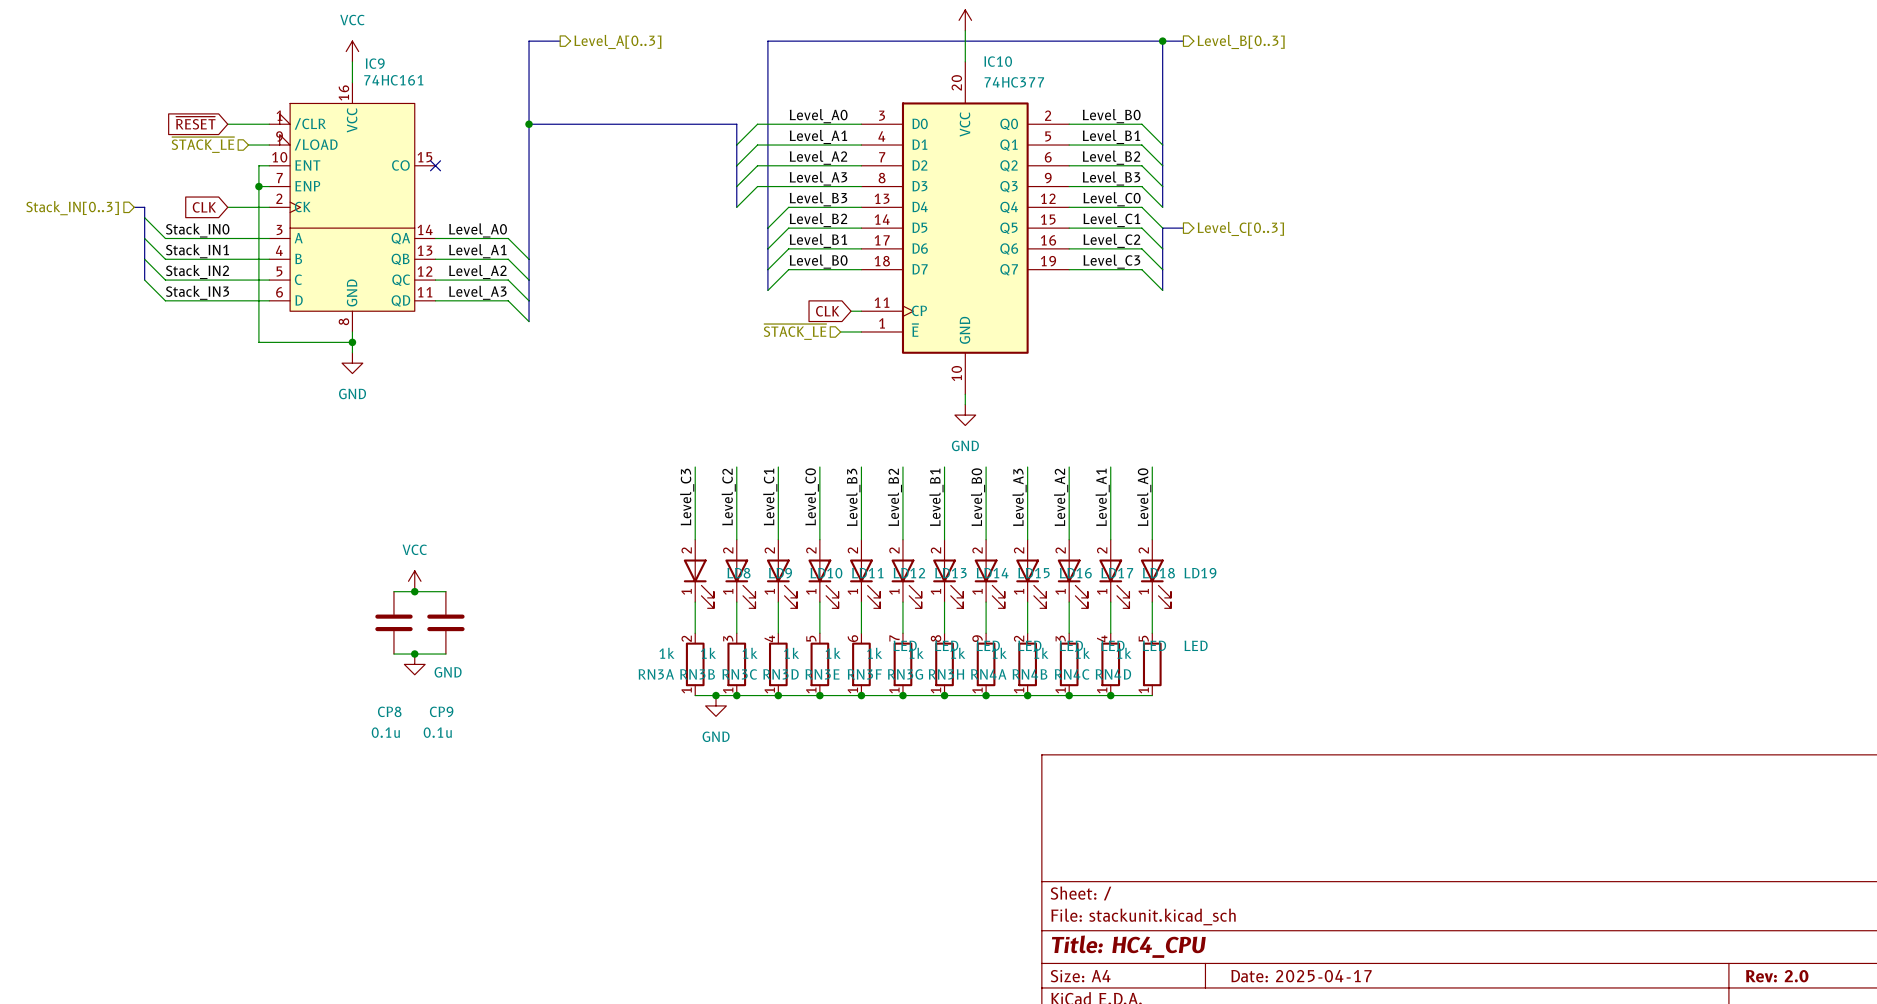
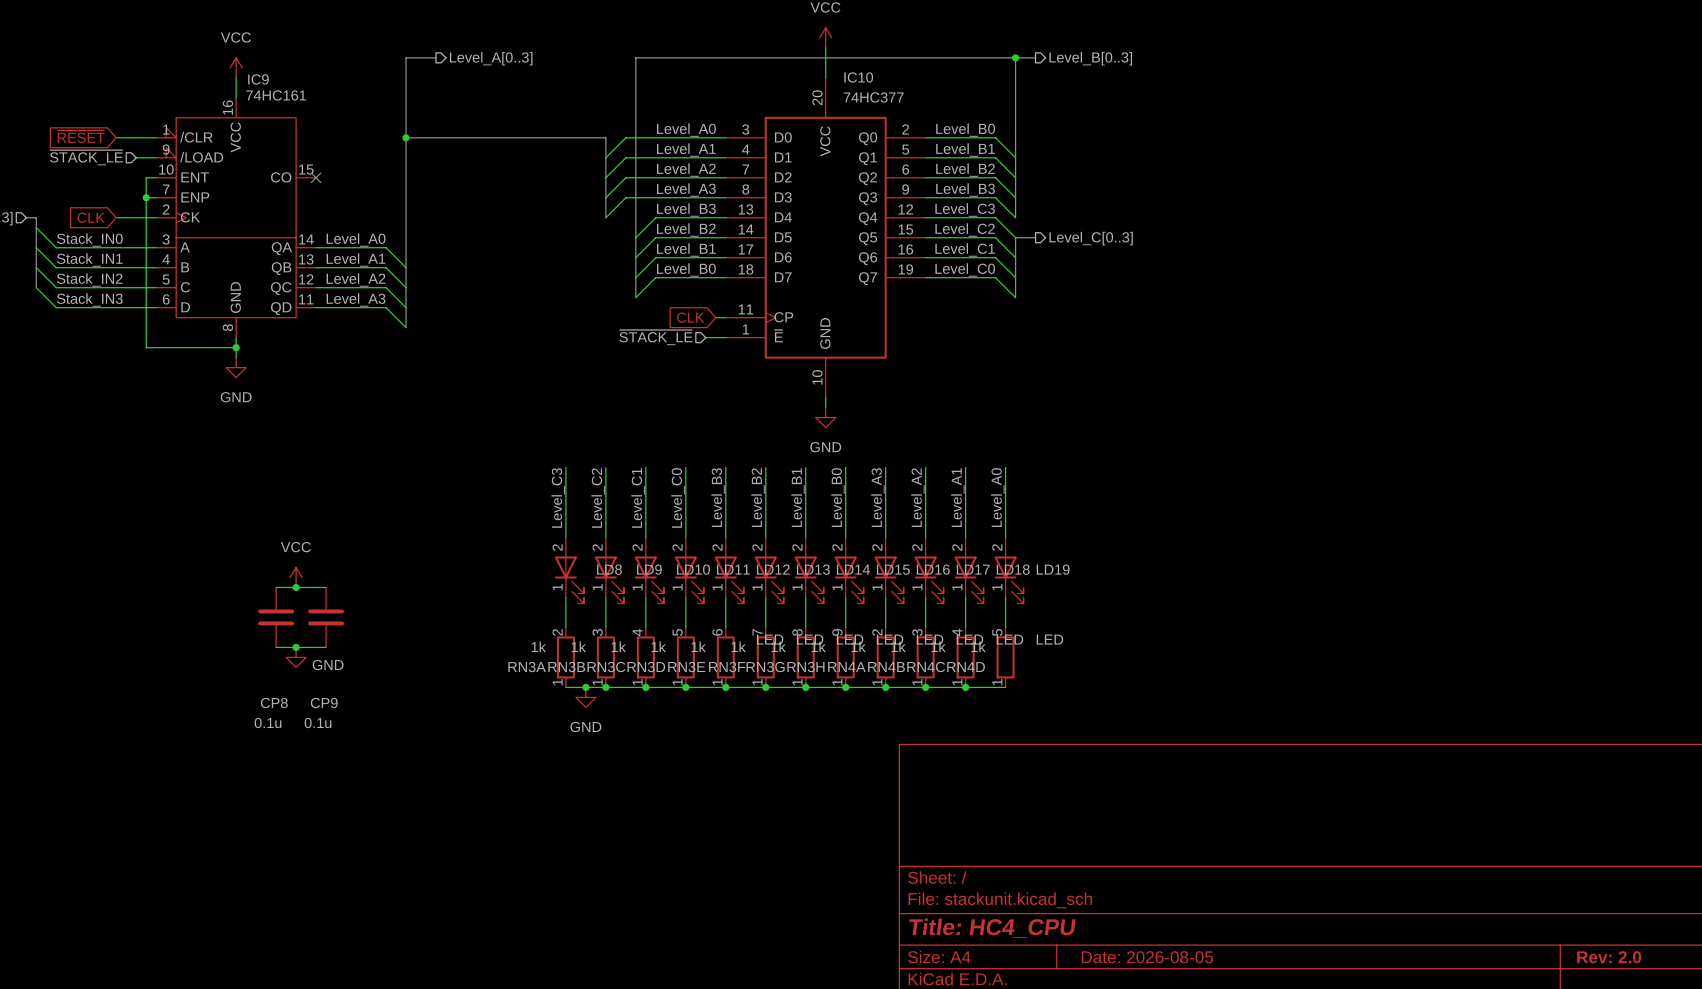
label: Level_C0 (1112, 199) -> Level_C3 (965, 210)
label: Level_C1 (1111, 220) -> Level_C2 (965, 229)
label: Level_C2 (1111, 240) -> Level_C1 (965, 249)
label: Level_C3 (1111, 261) -> Level_C0 (965, 269)
title block: Date: 2025-04-17 (1301, 976) -> Date: 2026-08-05 (1147, 957)

